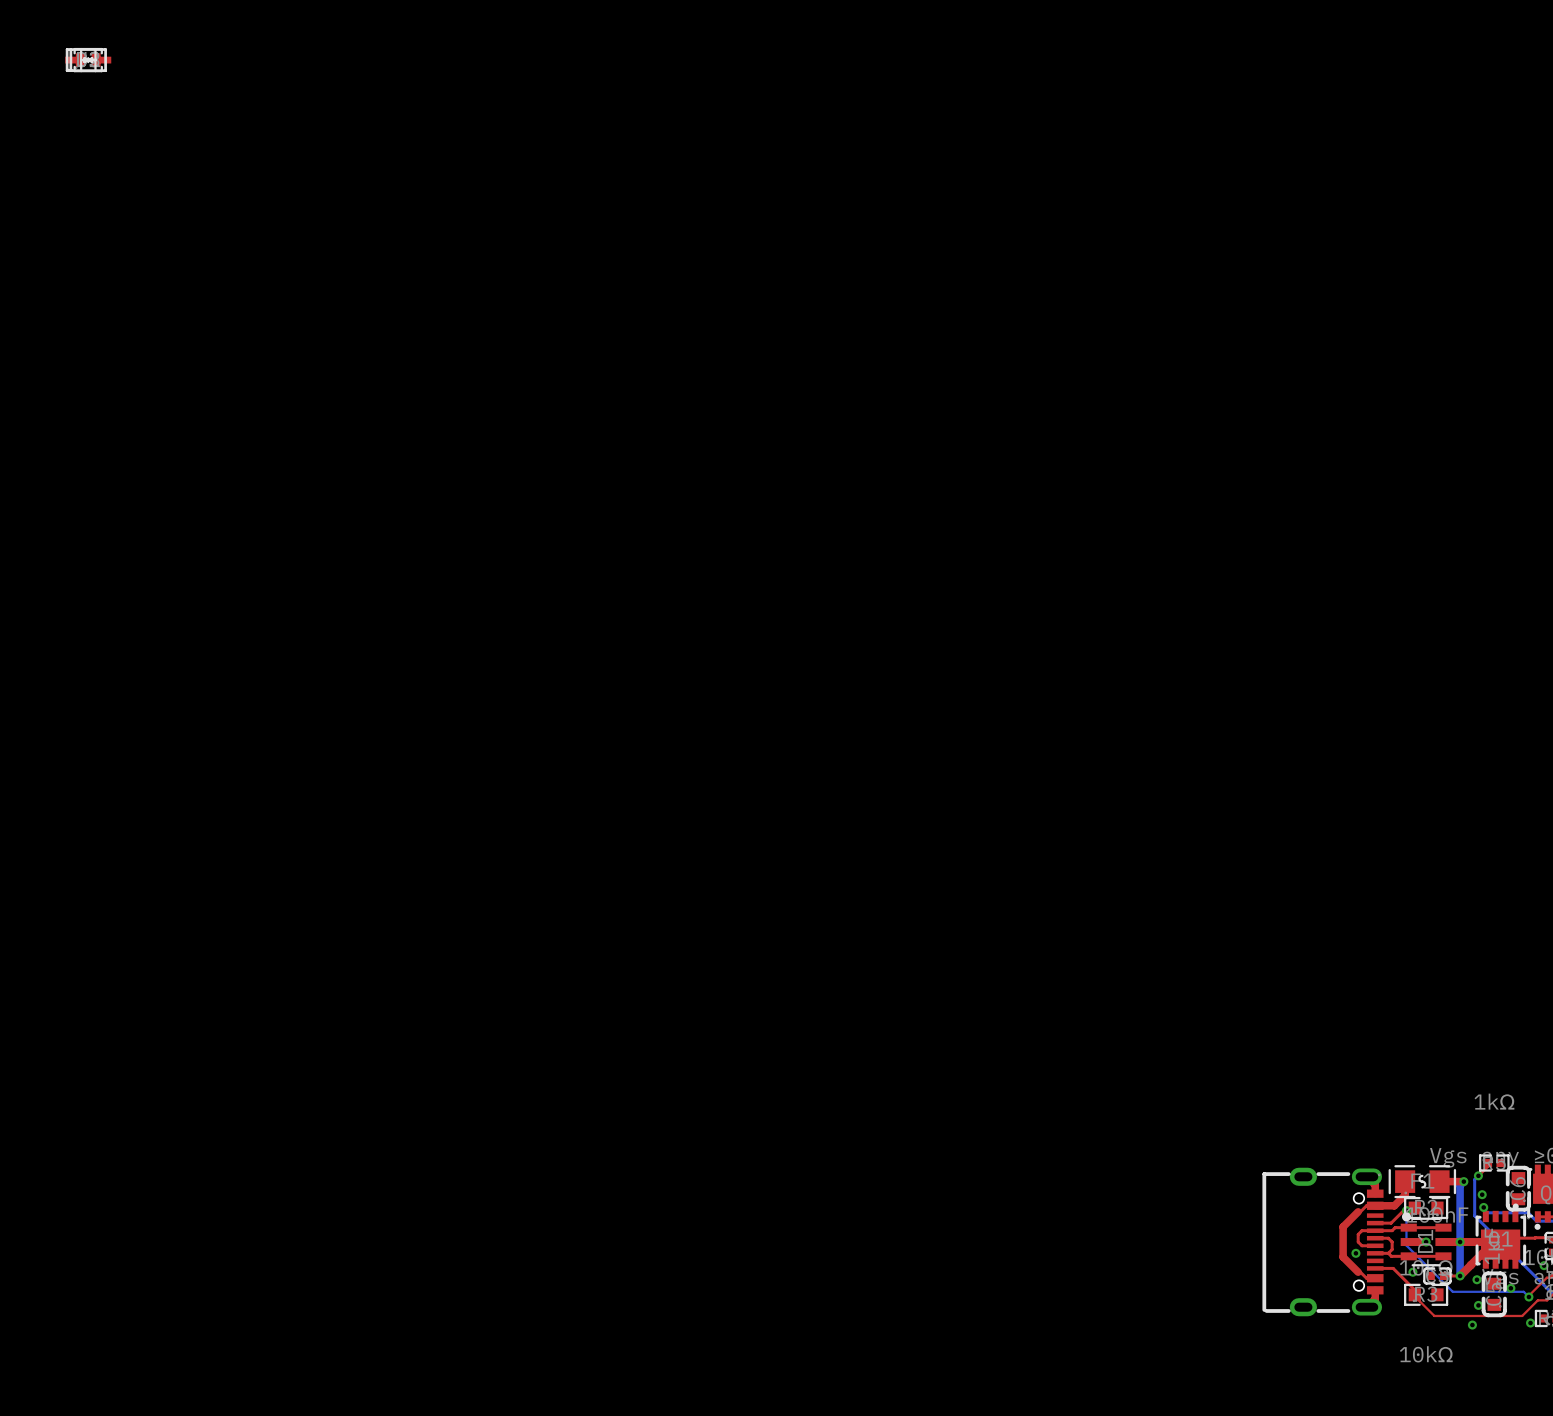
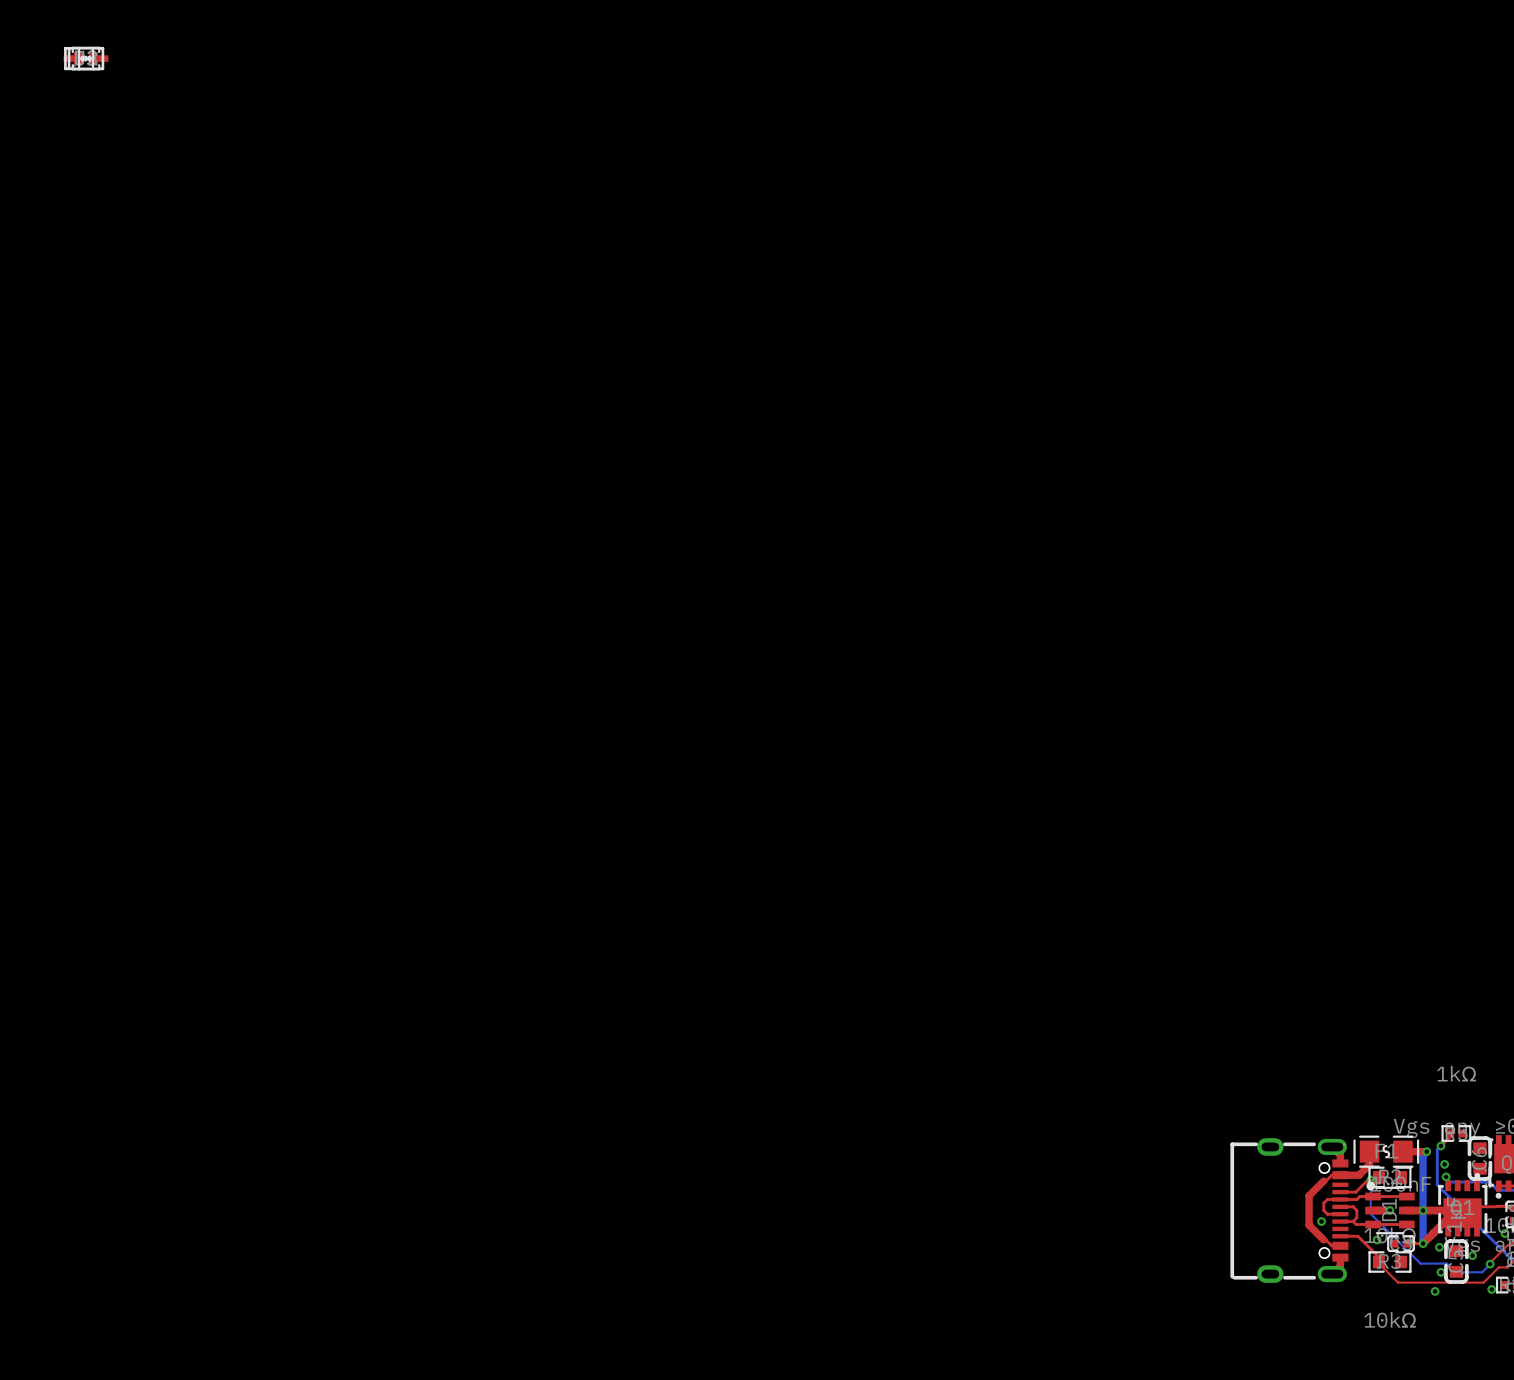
bottom track: (1452, 1291) (1523, 1291) (1528, 1297) -> (1415, 1259) (1420, 1263) (1446, 1263) (1455, 1272) (1482, 1272) (1490, 1264)

